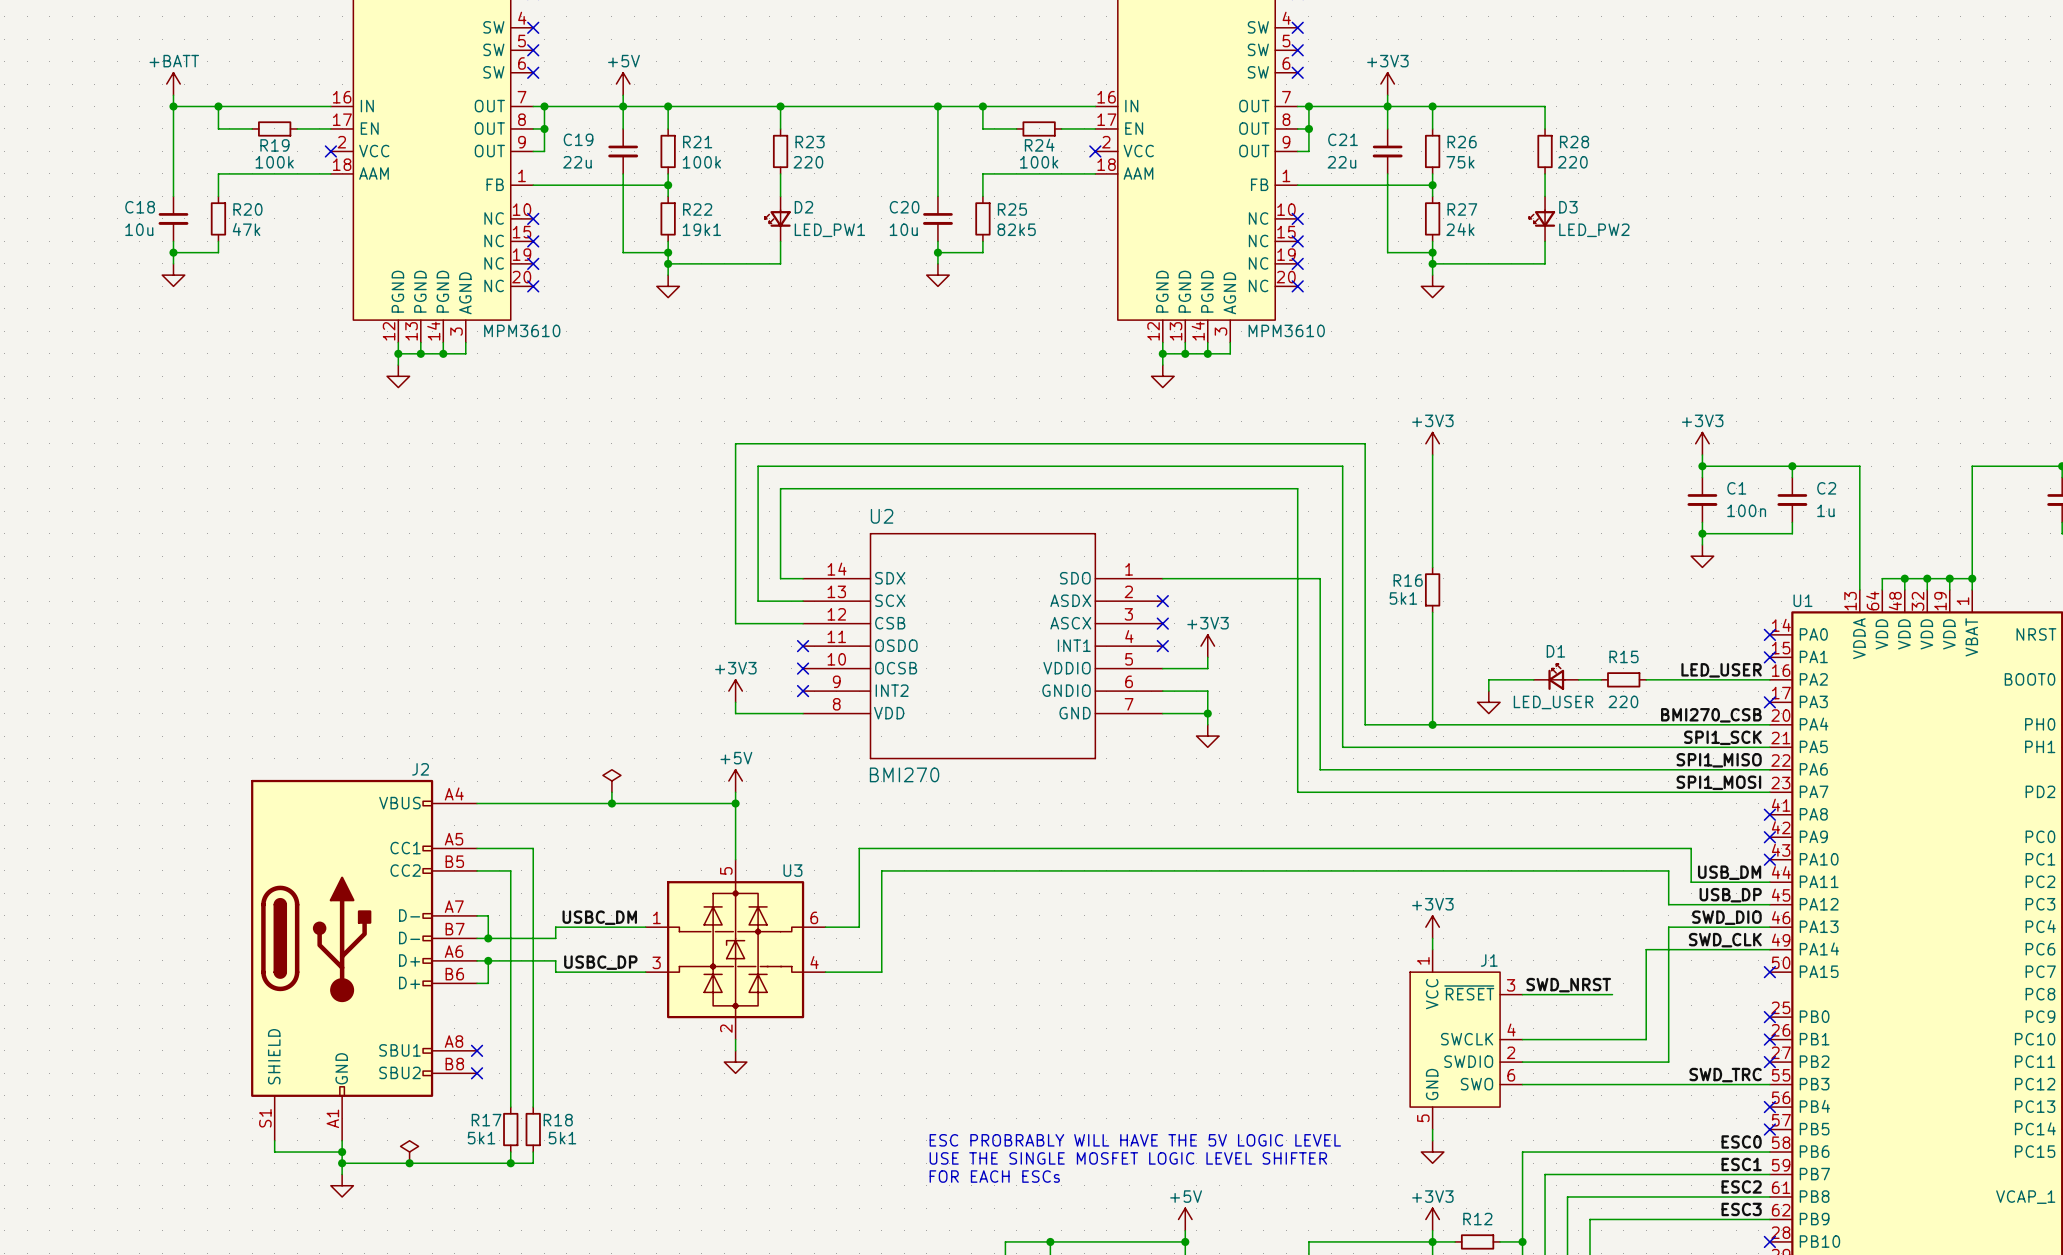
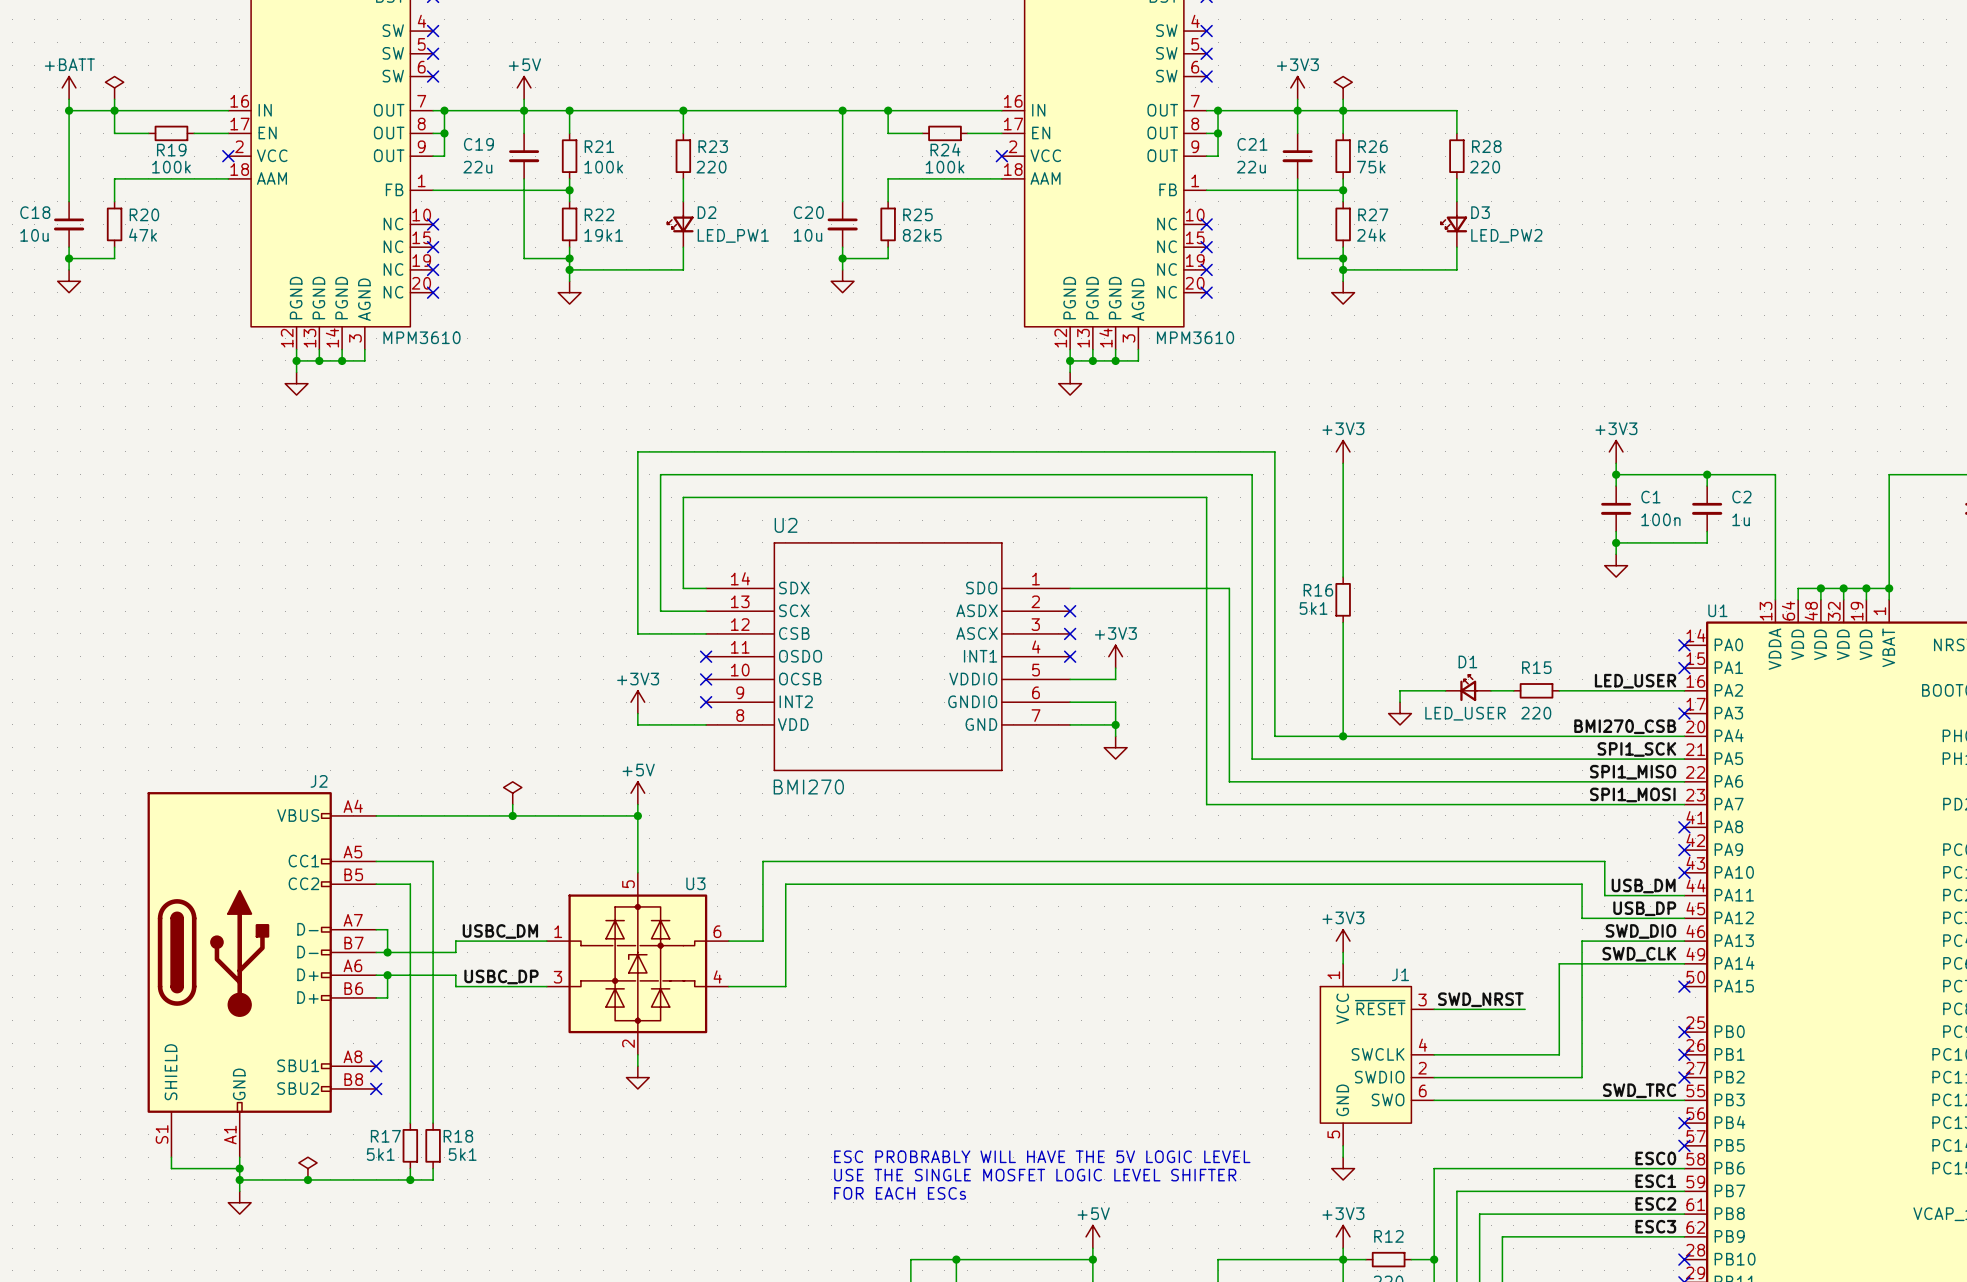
power symbol: none -> (114, 87)
power symbol: none -> (1343, 87)
wire: none -> (114, 99) (114, 110)
wire: none -> (1343, 99) (1343, 110)

